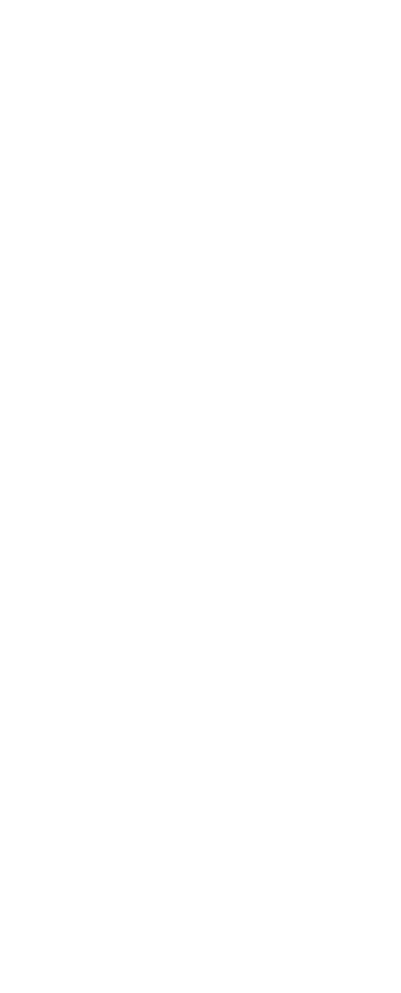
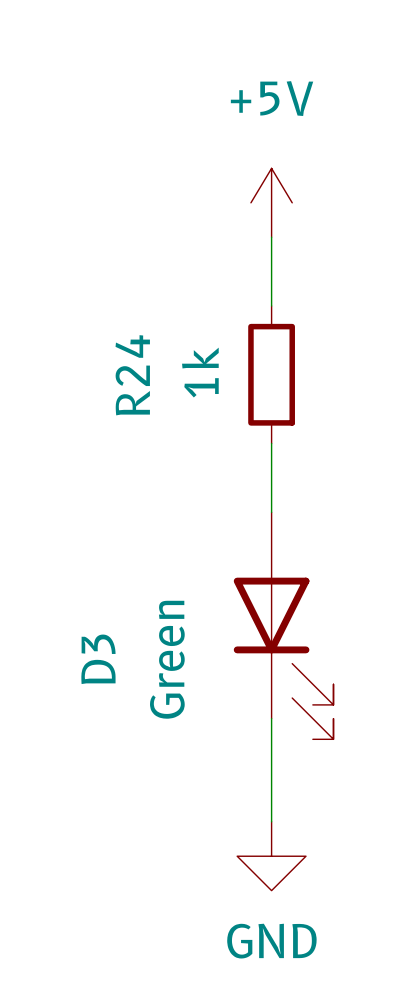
power symbol: none -> +5V (271, 202)
wire: none -> (271, 237) (271, 305)
R24: none -> 1k (271, 374)
wire: none -> (271, 443) (271, 512)
D3: none -> Green (283, 625)
wire: none -> (271, 718) (271, 821)
power symbol: none -> GND (271, 856)

